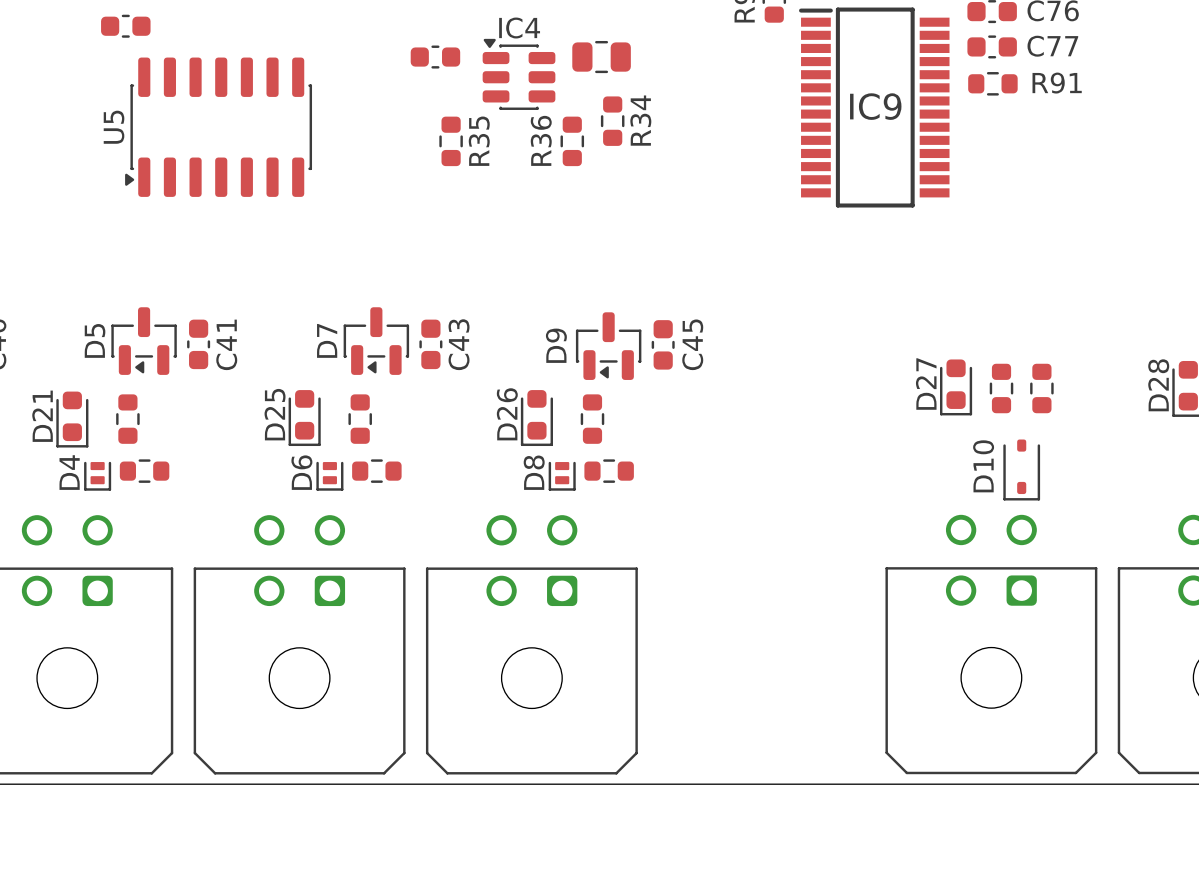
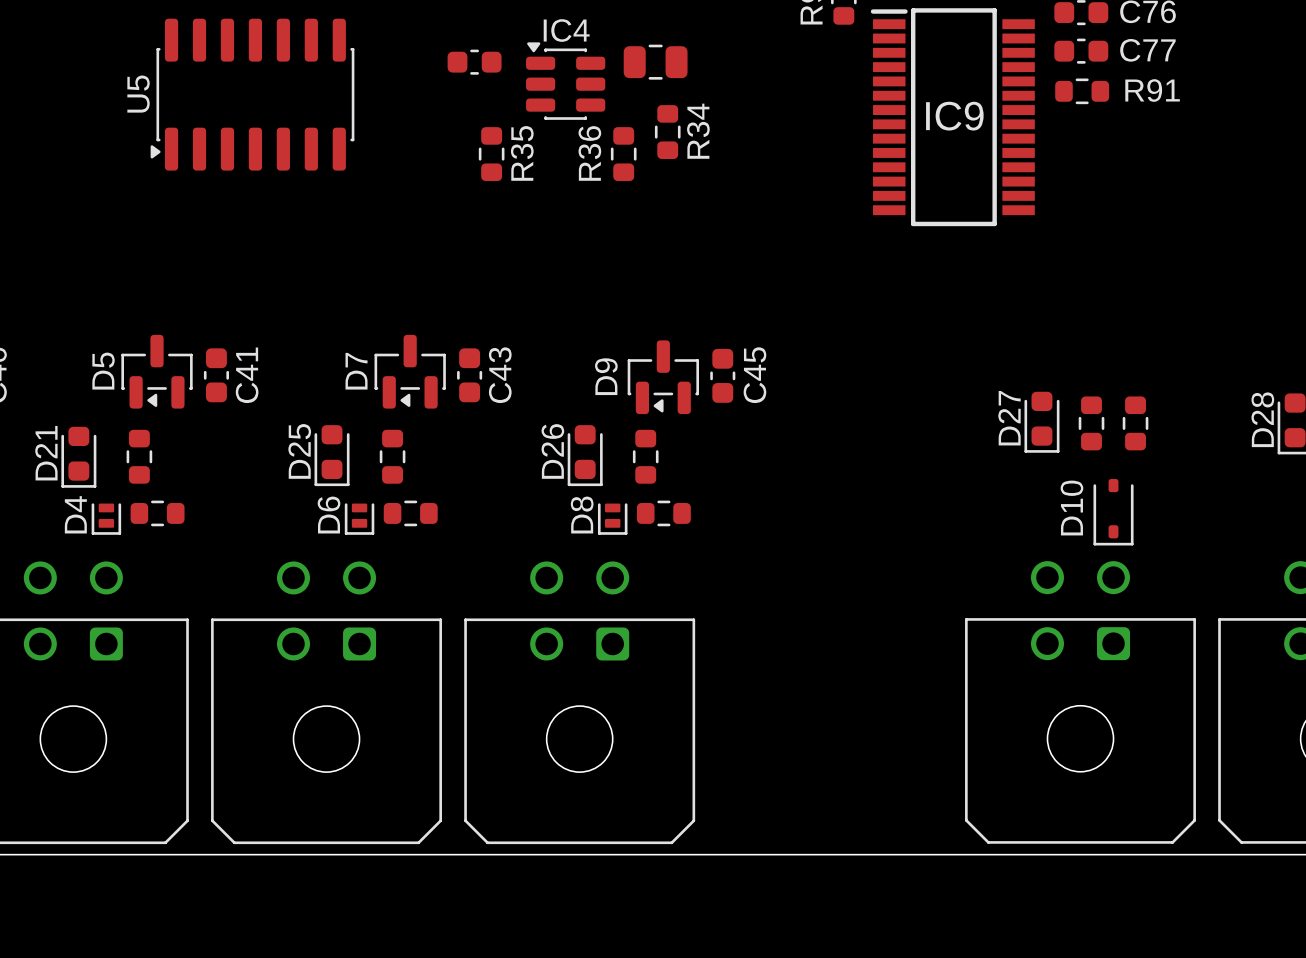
part: (125, 26) -> none
U5 position: (218, 127) -> (252, 94)

